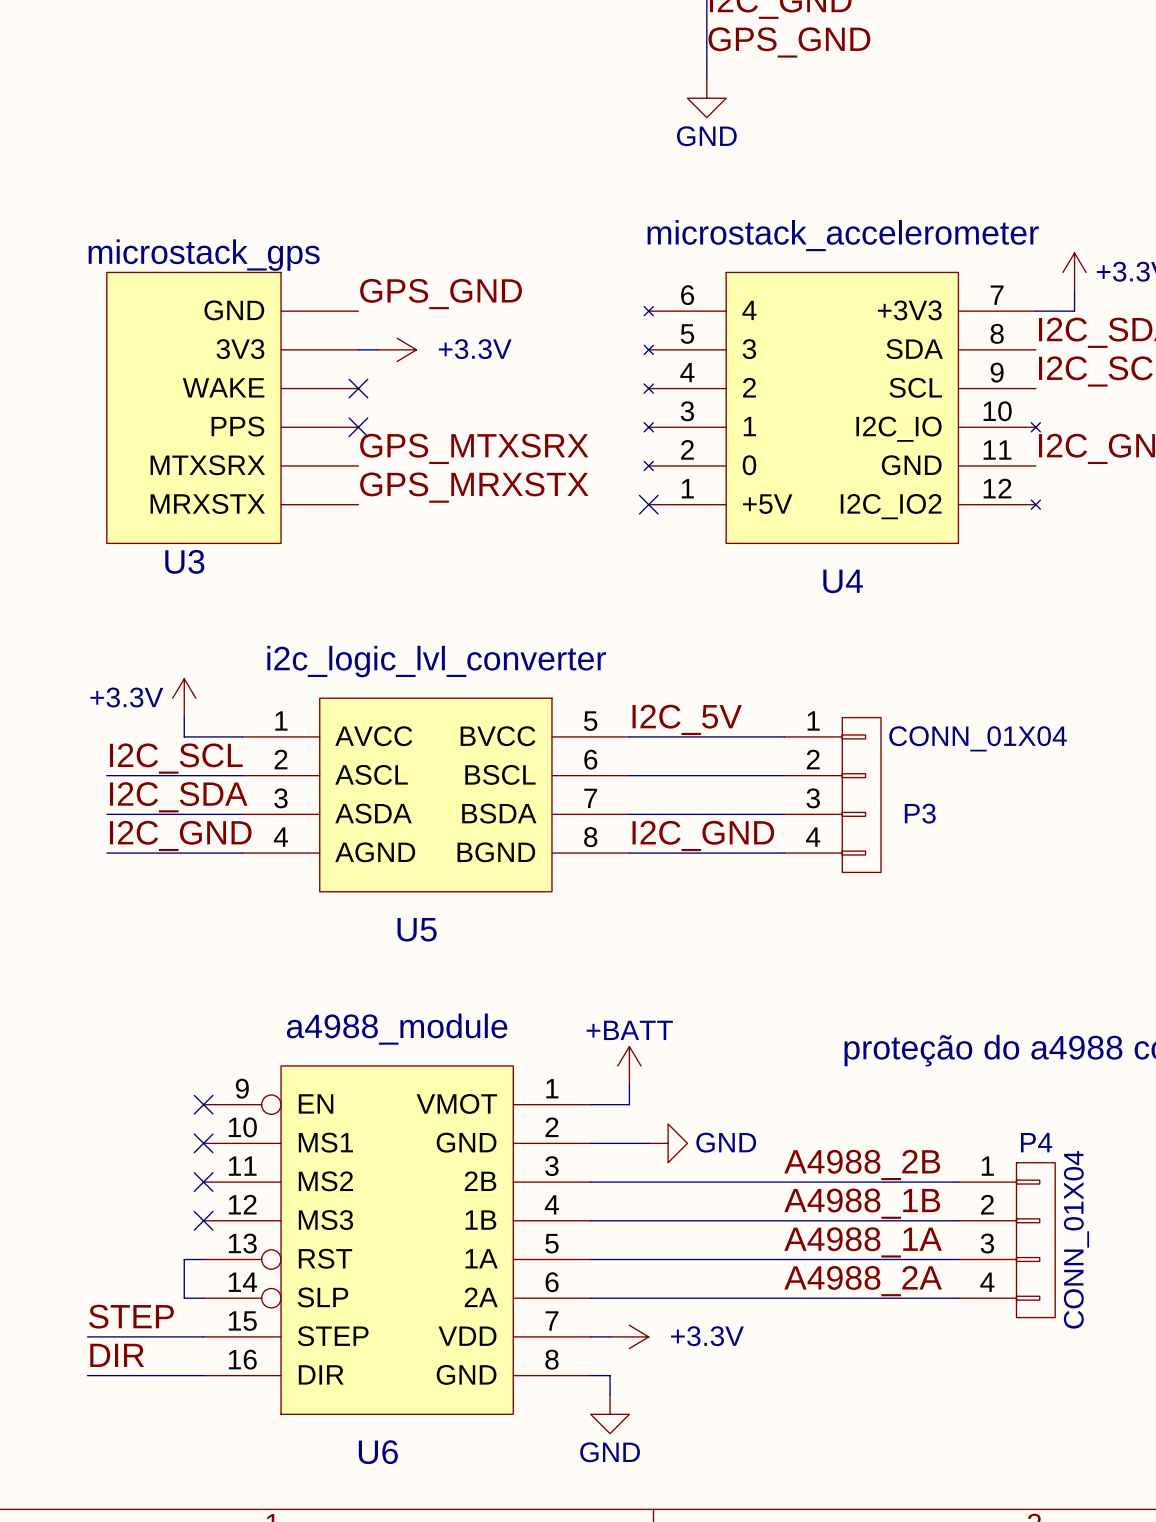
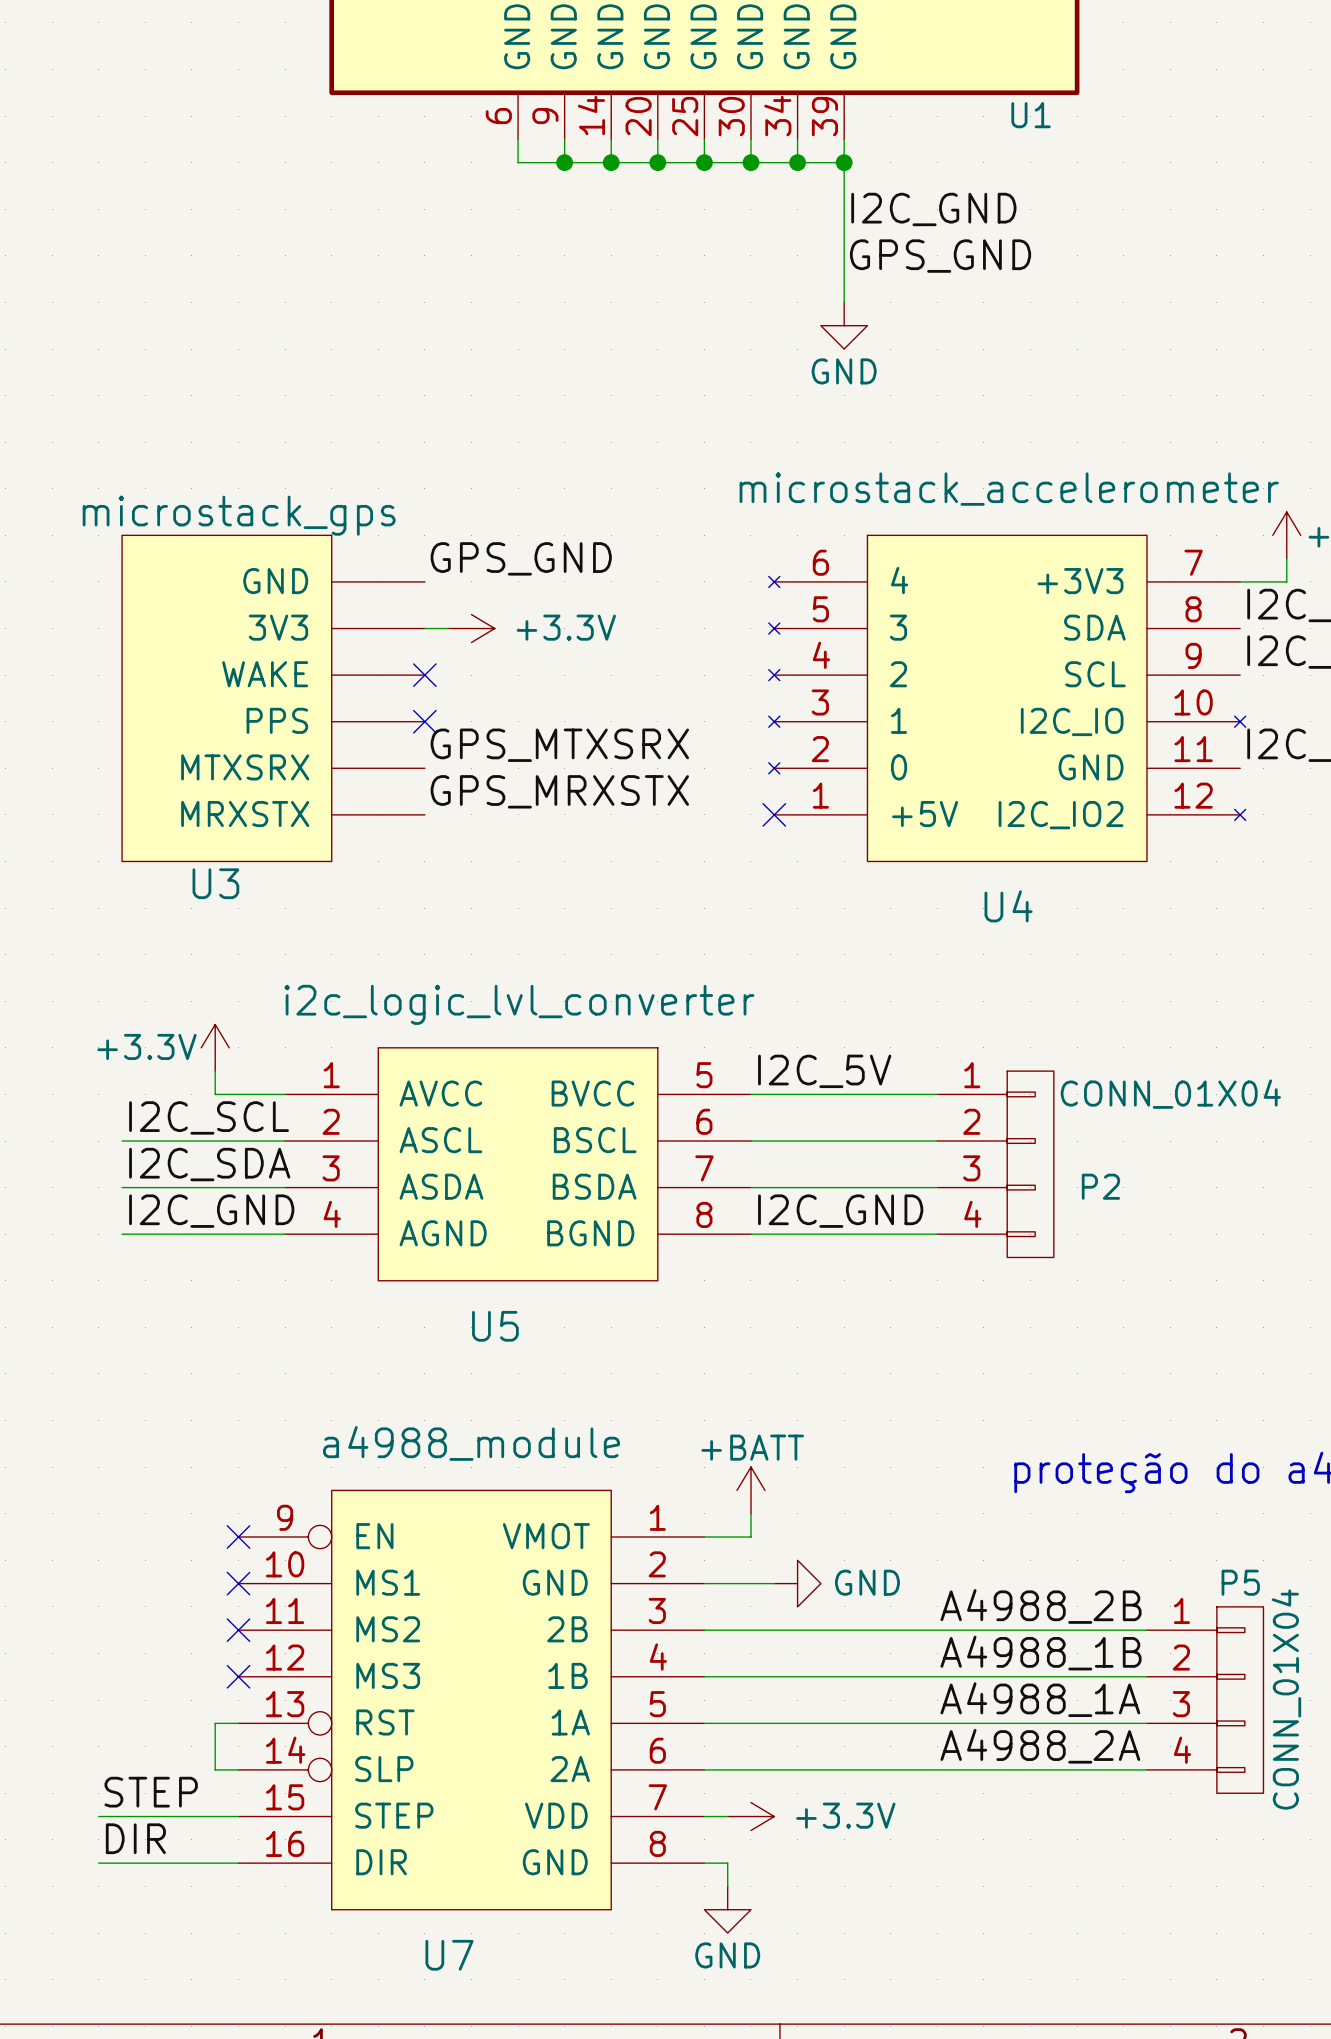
P3 name: P3 (920, 813) -> P2 (1100, 1186)
P4 name: P4 (1036, 1142) -> P5 (1240, 1582)
U6 name: U6 (378, 1452) -> U7 (449, 1955)

